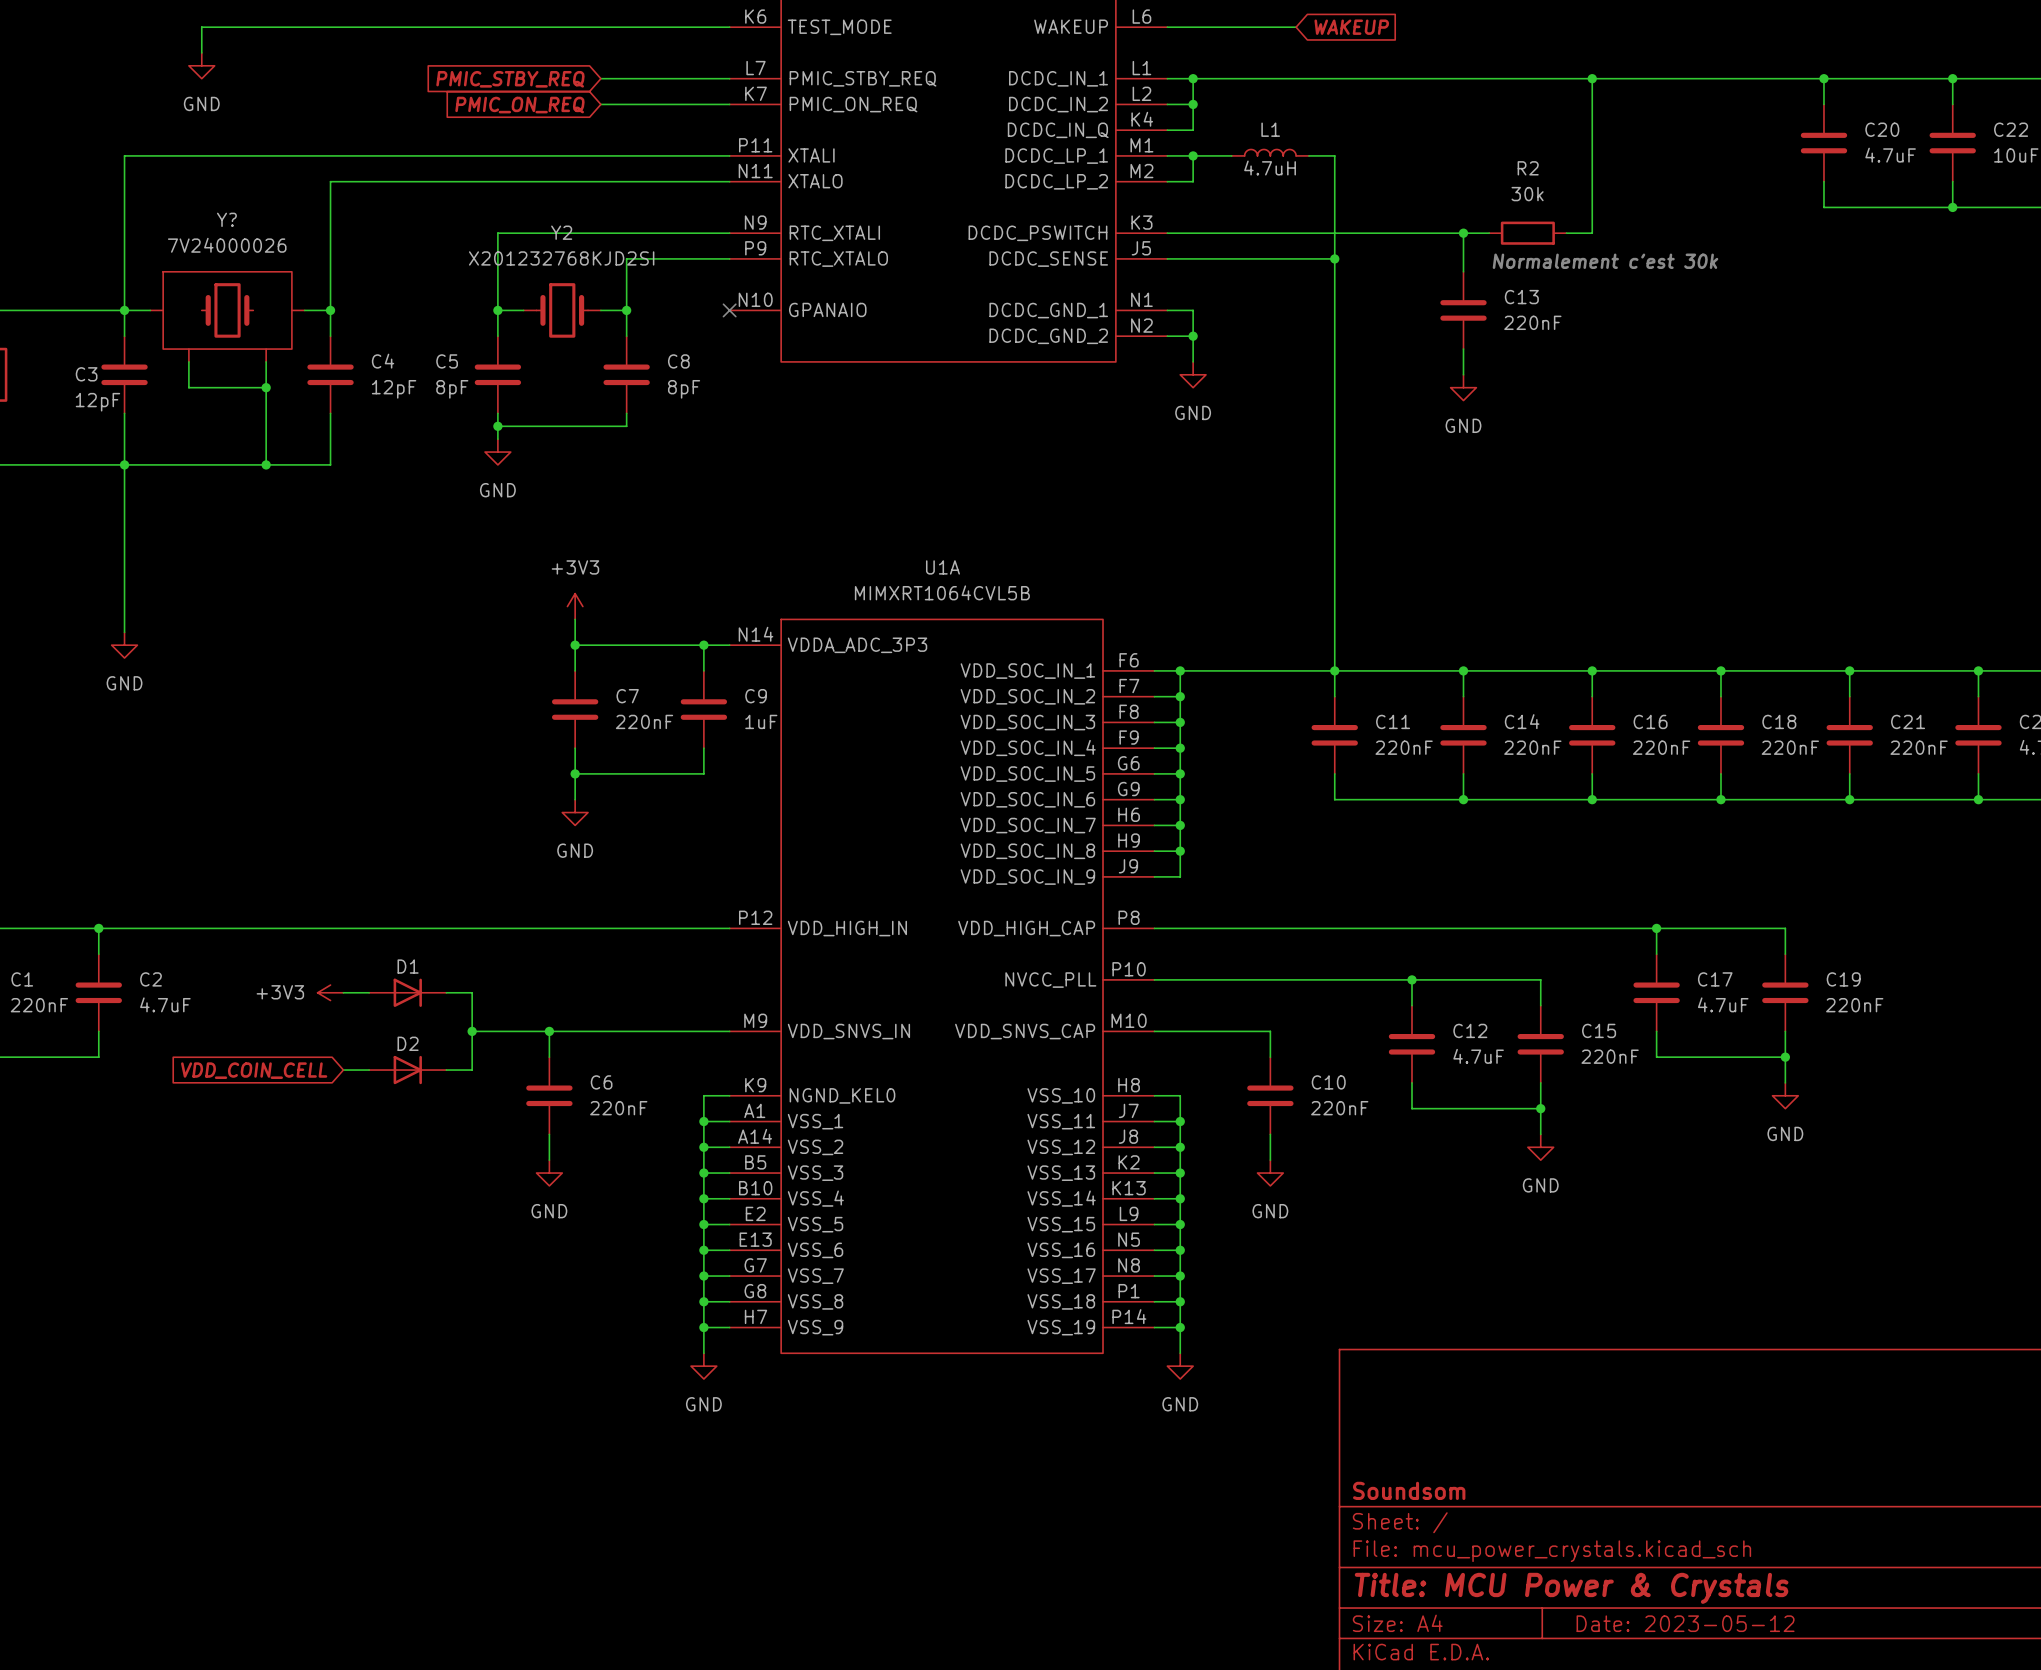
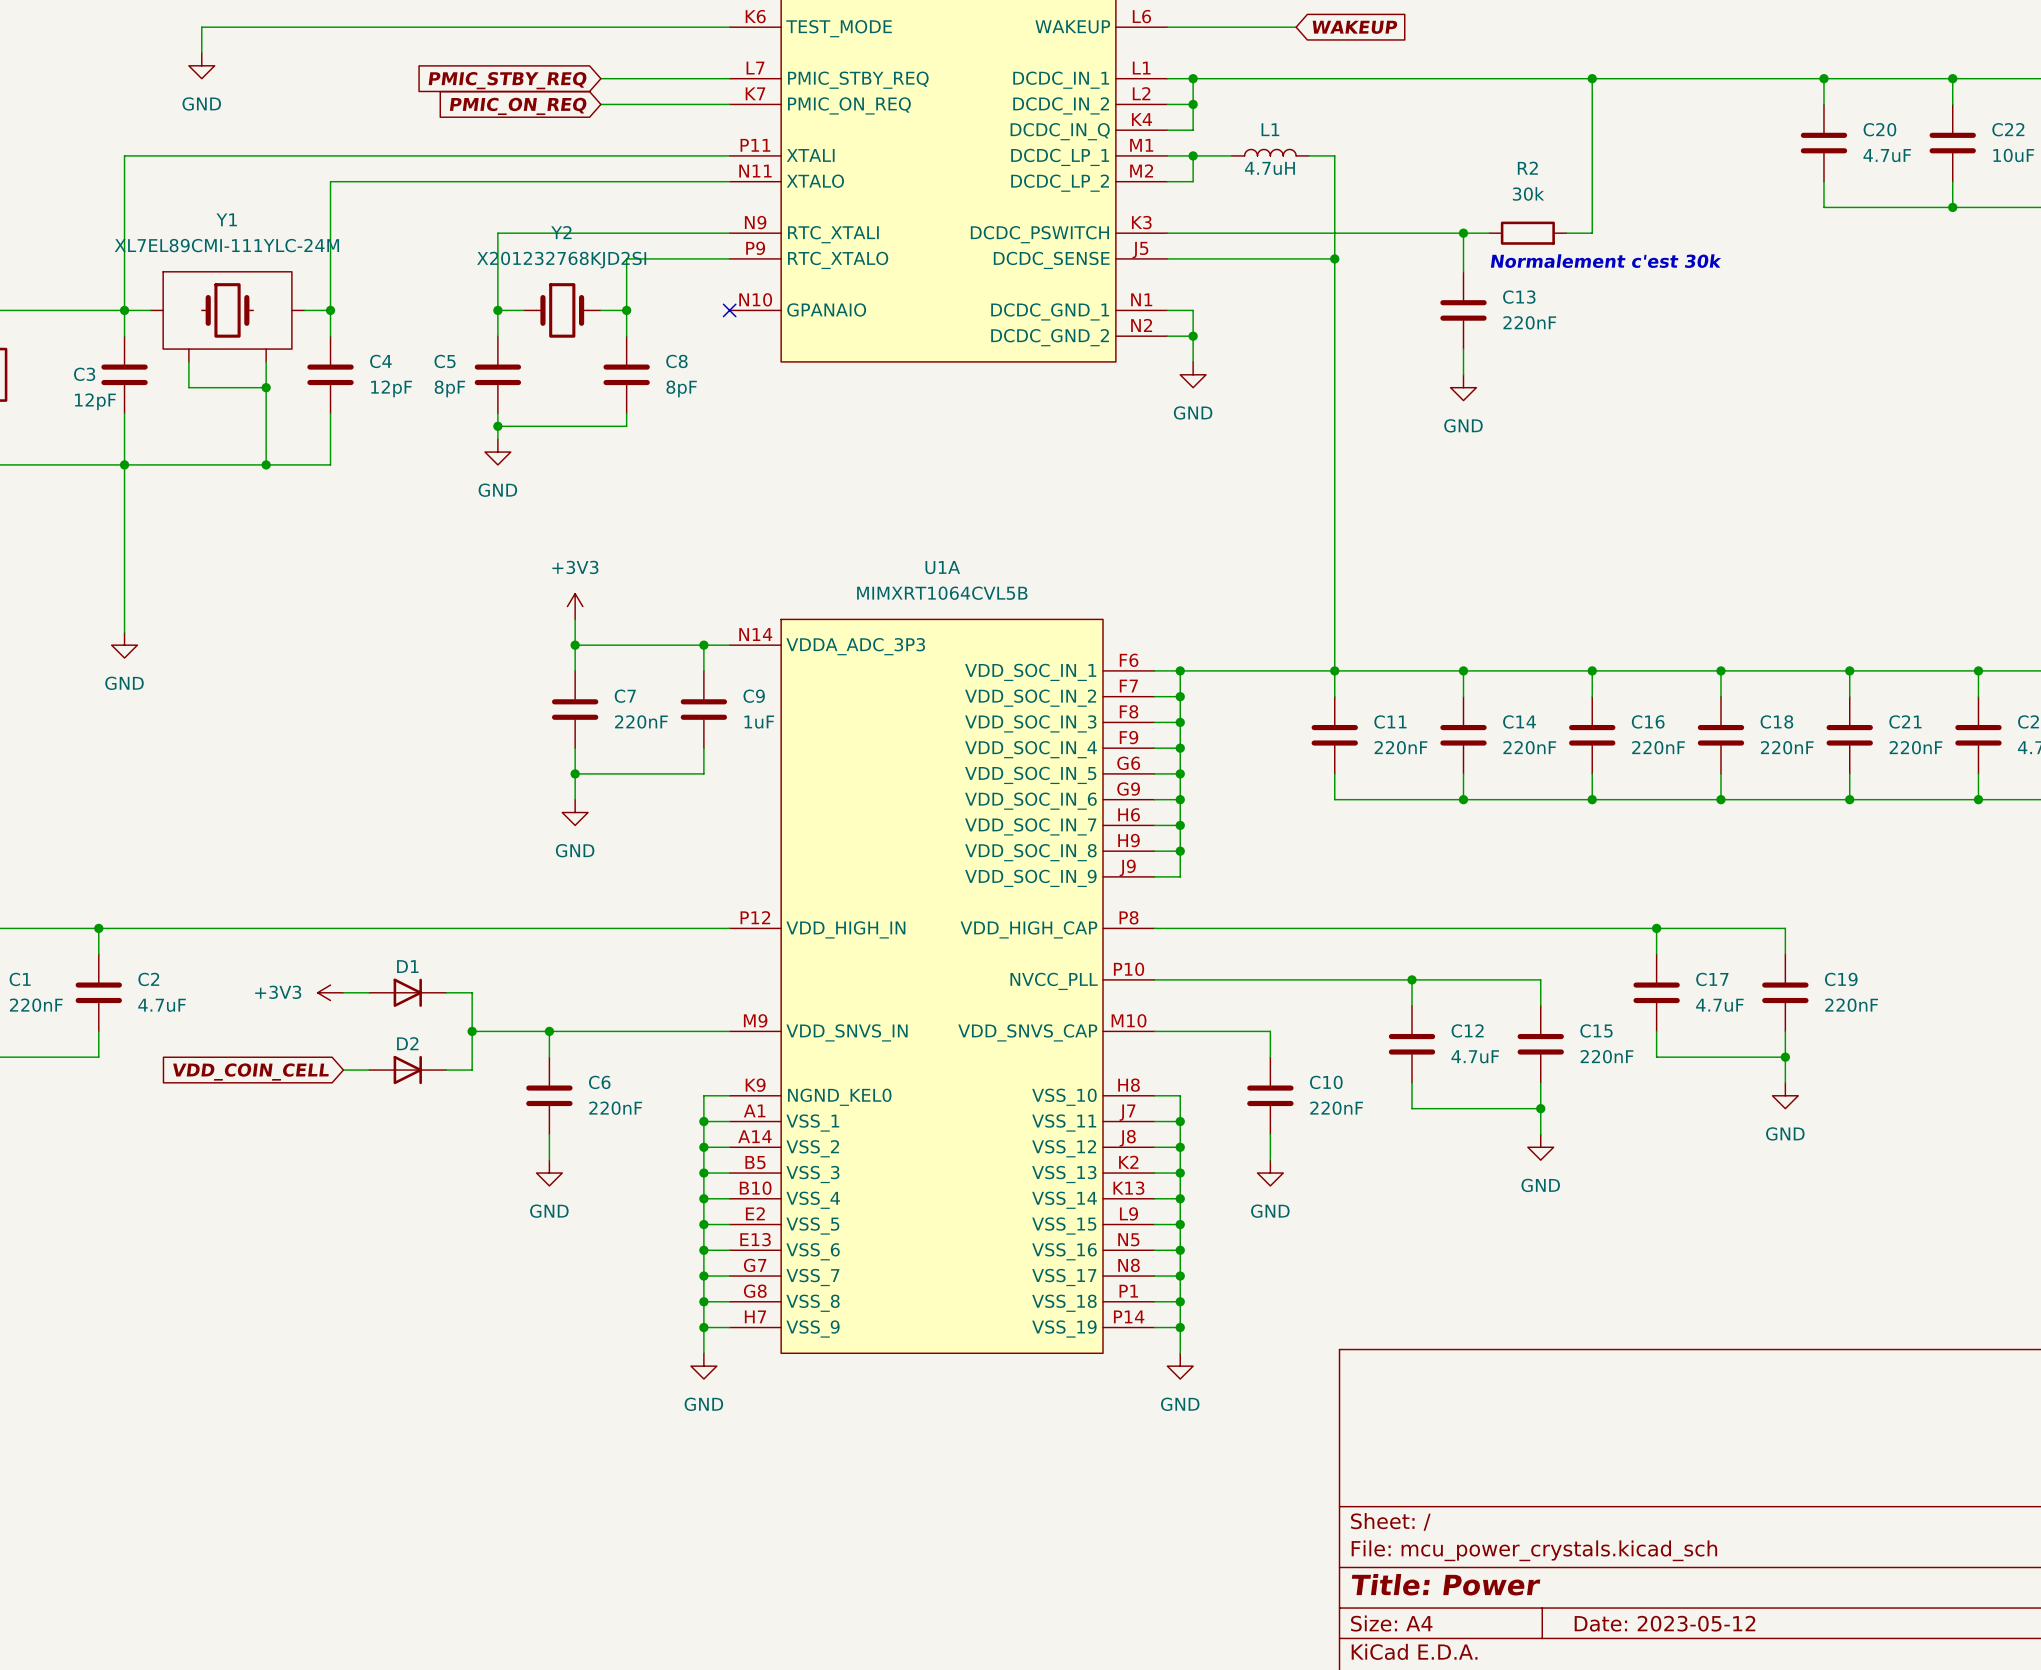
Y? name: Y? (226, 219) -> Y1 (226, 219)
Y? value: 7V24000026 (227, 245) -> XL7EL89CMI-111YLC-24M (226, 245)
title block: Soundsom (1409, 1490) -> none
title block: Title: MCU Power & Crystals (1571, 1588) -> Title: Power (1446, 1584)

